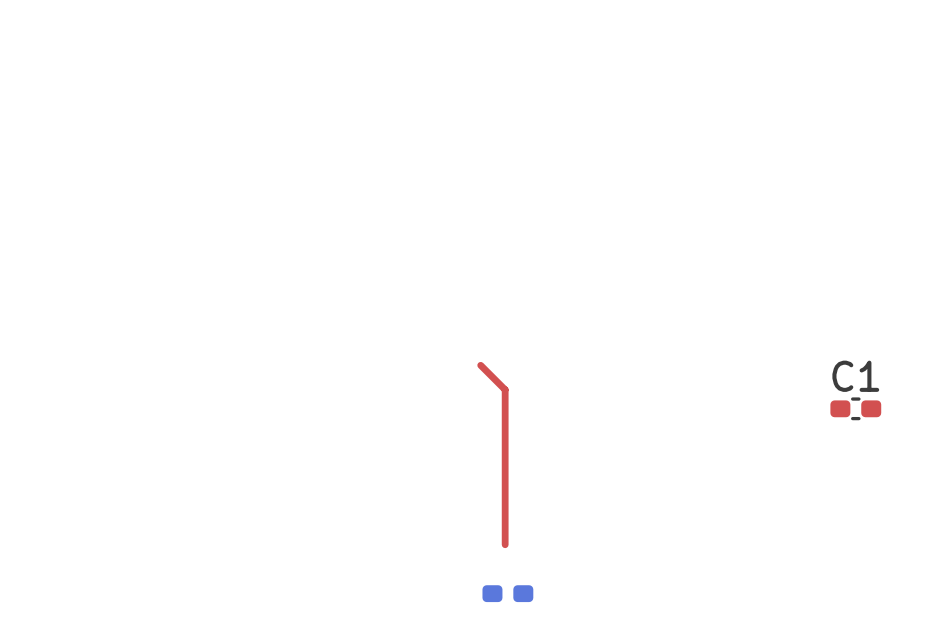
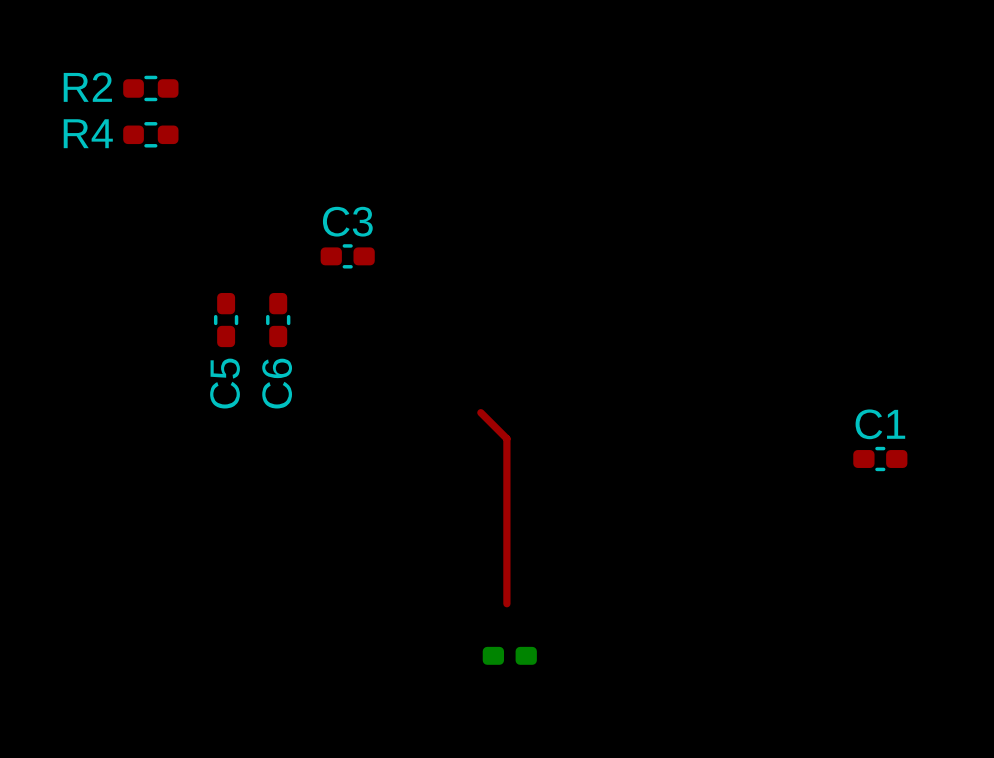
R2: none -> (150, 88)
R4: none -> (150, 134)
C3: none -> (347, 256)
C5: none -> (226, 320)
C6: none -> (278, 320)

